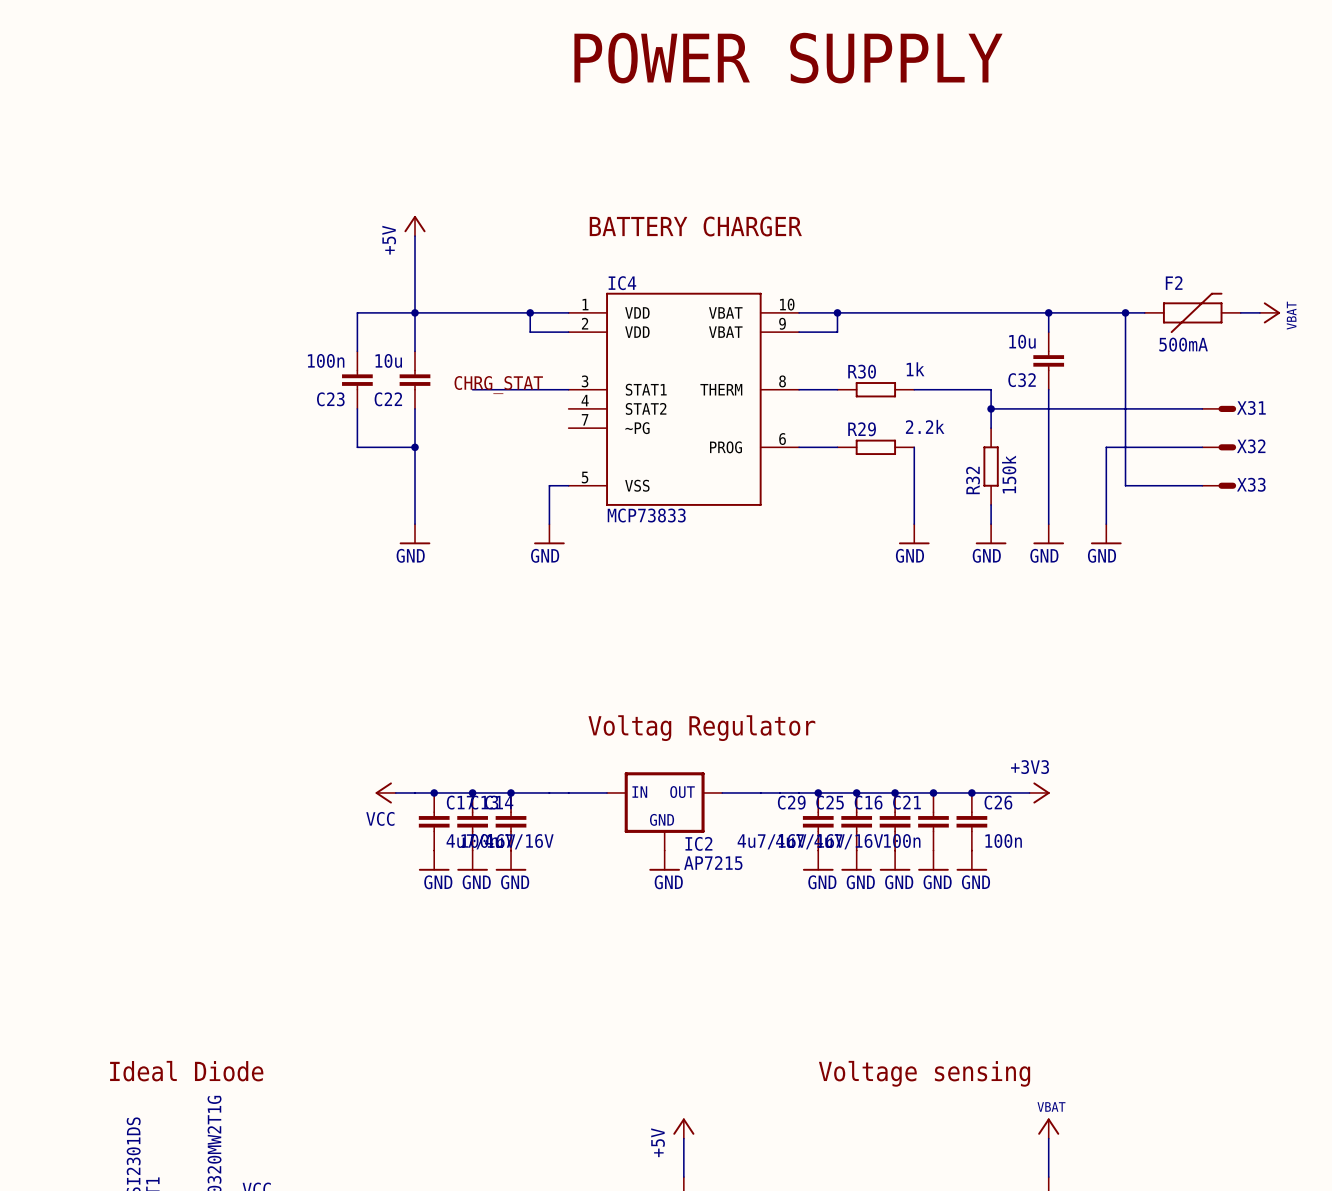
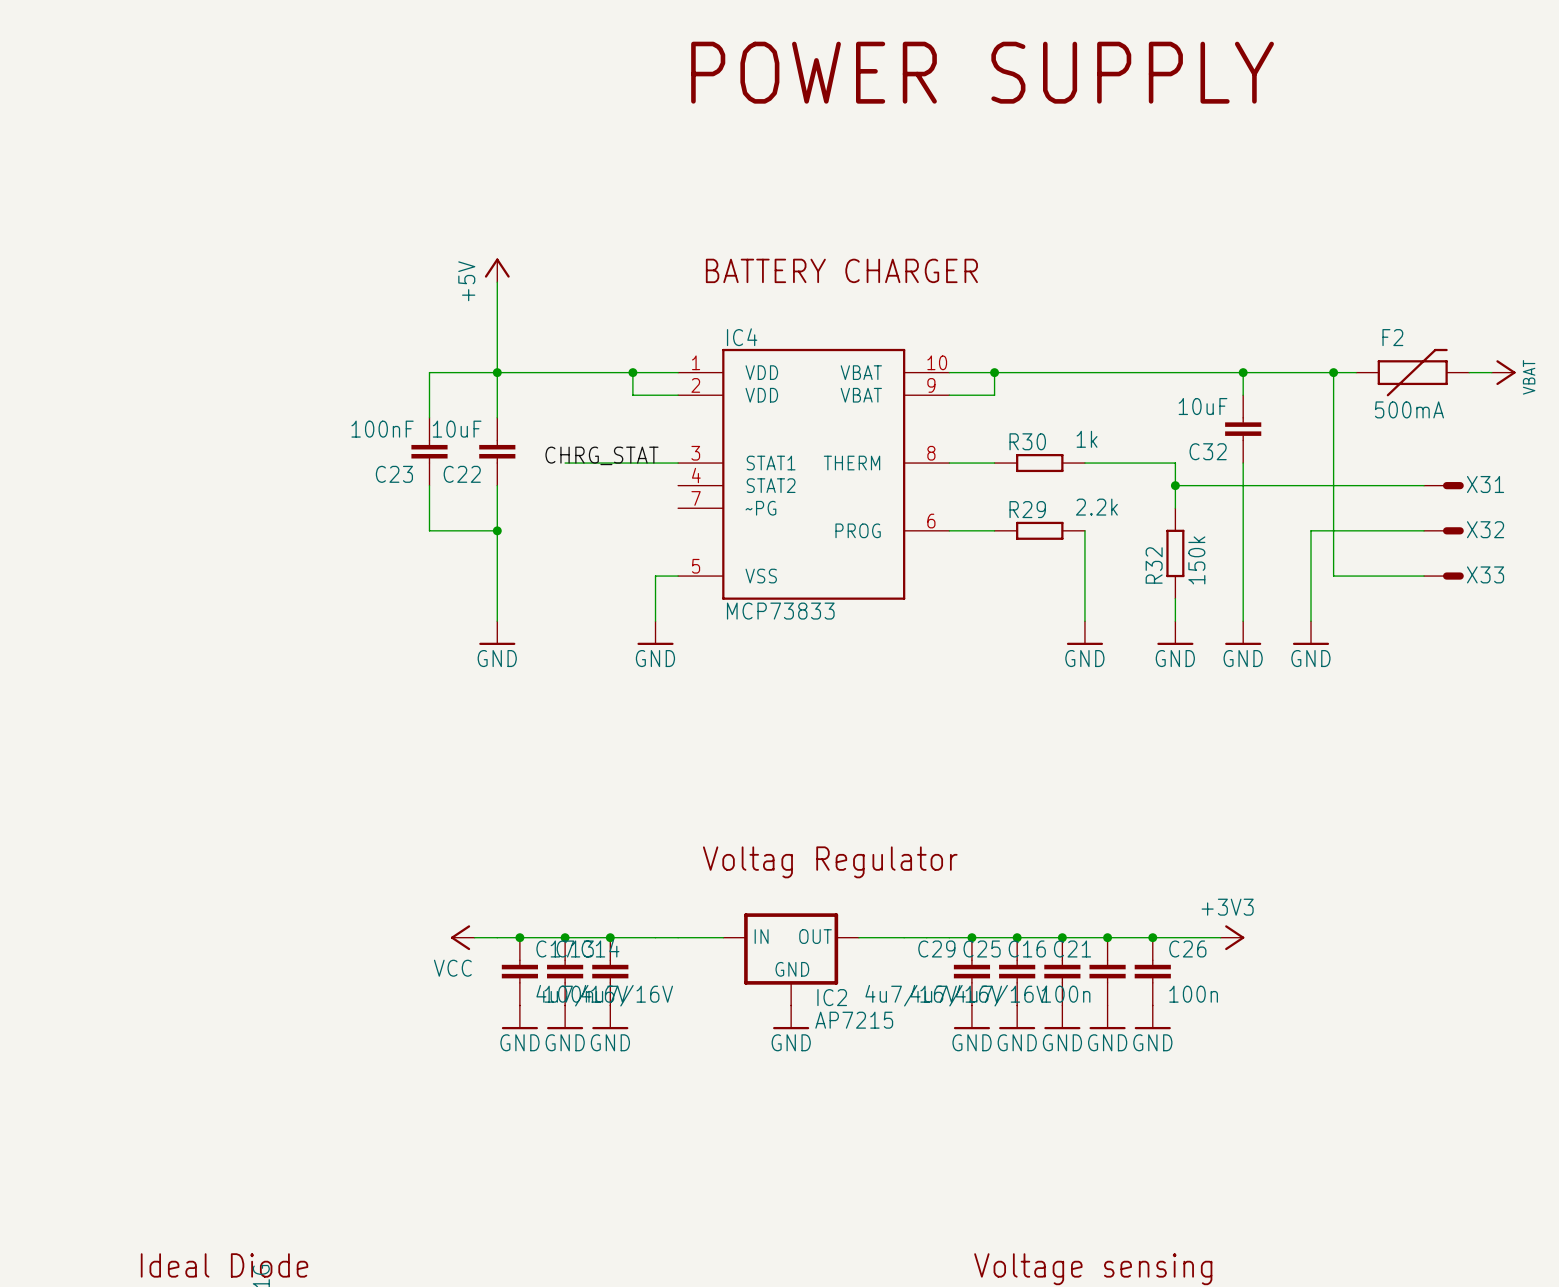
C32 value: 10u (1022, 341) -> 10uF (1203, 406)
C23 value: 100n (326, 360) -> 100nF (382, 429)
C22 value: 10u (388, 360) -> 10uF (457, 429)

